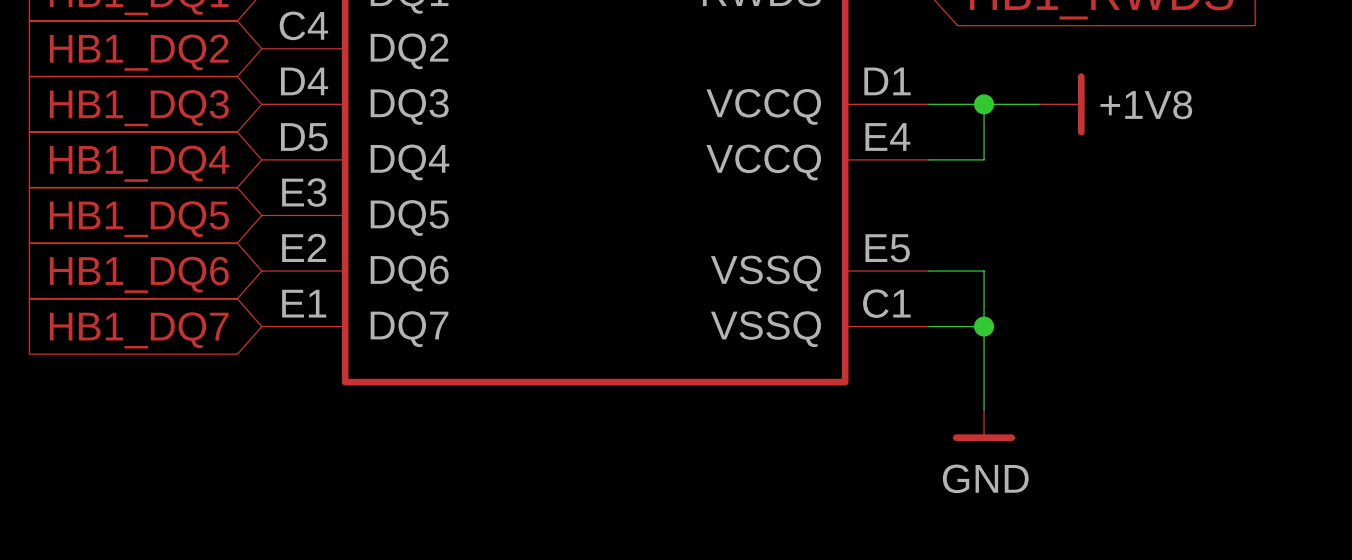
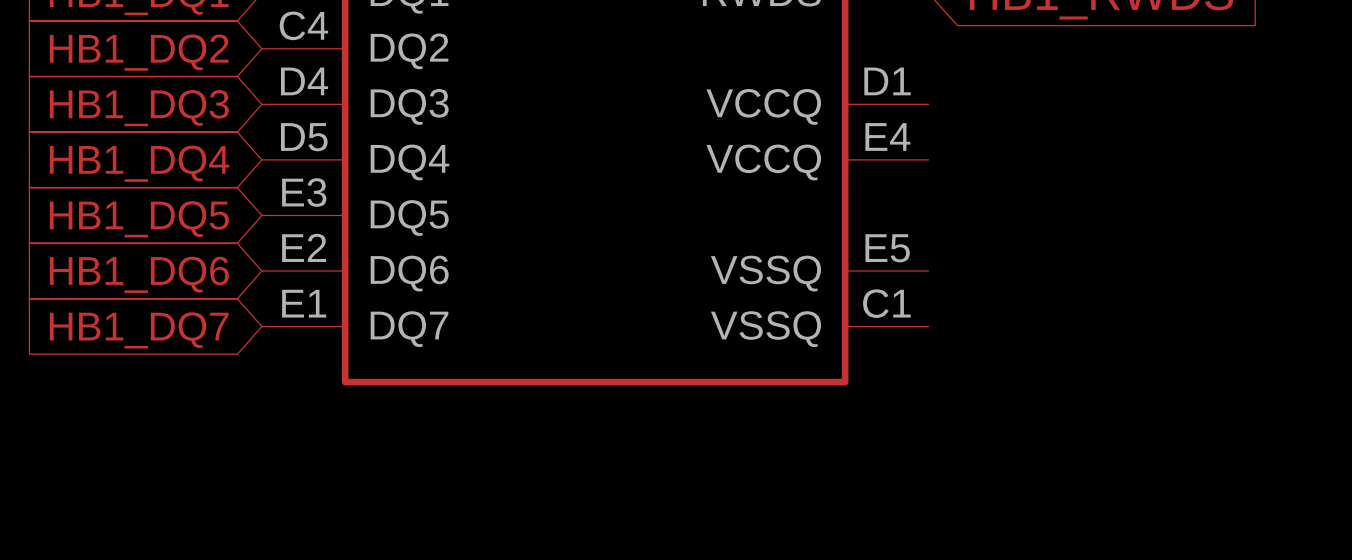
wire: (928, 104) (1039, 104) -> none
wire: (984, 104) (984, 159) (928, 159) -> none
junction: (984, 104) -> none
power symbol: +1V8 (1062, 104) -> none
wire: (928, 271) (984, 271) (984, 409) -> none
wire: (928, 326) (984, 326) -> none
junction: (984, 326) -> none
power symbol: GND (984, 425) -> none

